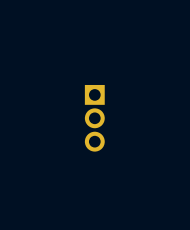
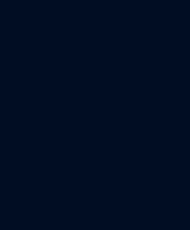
part: (94, 118) -> none

